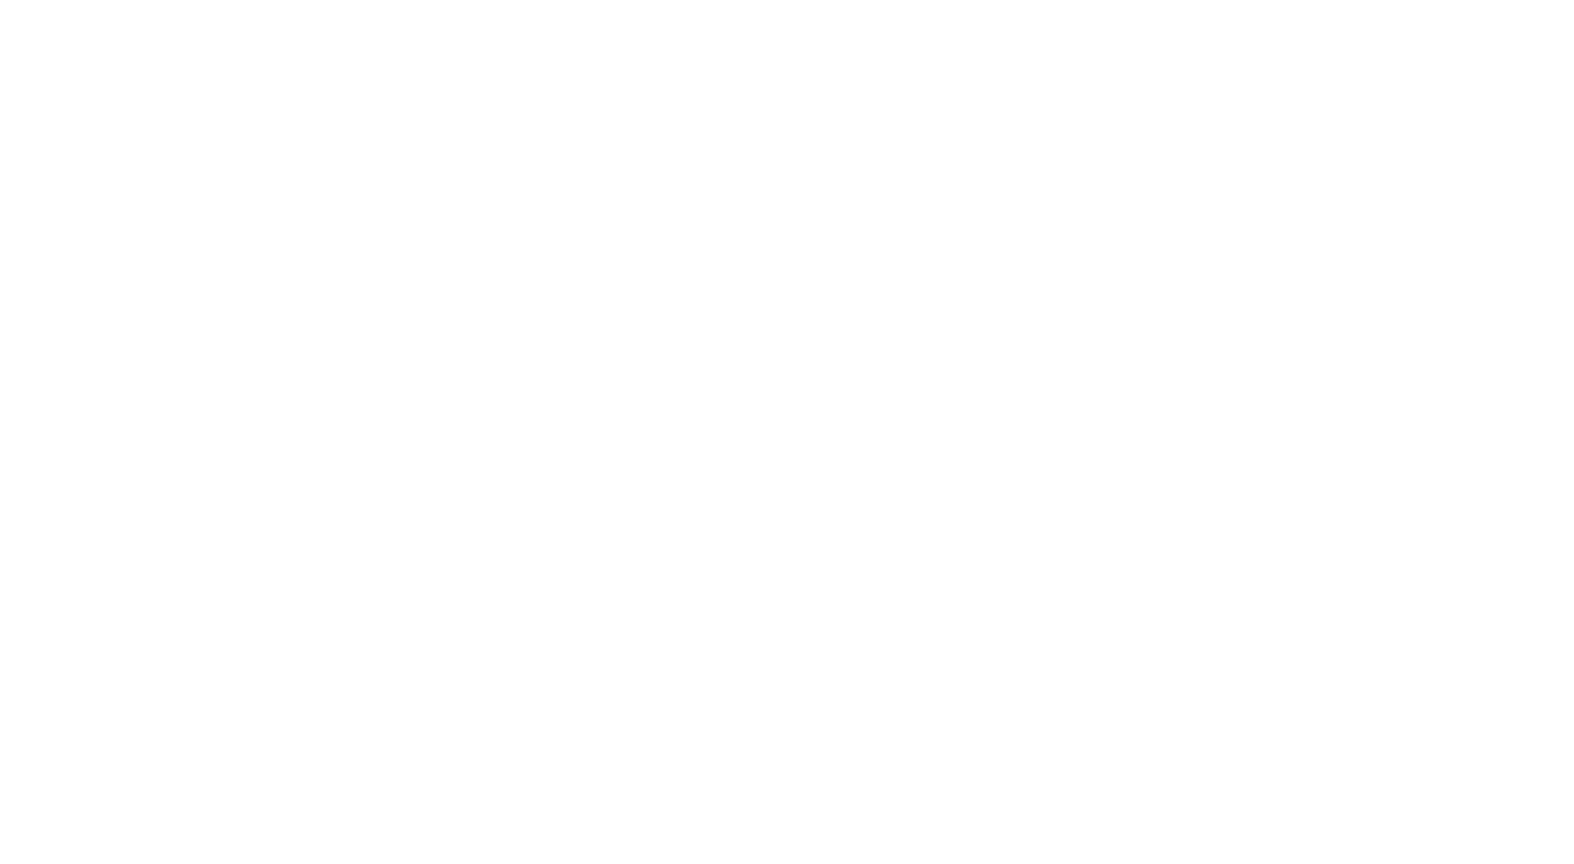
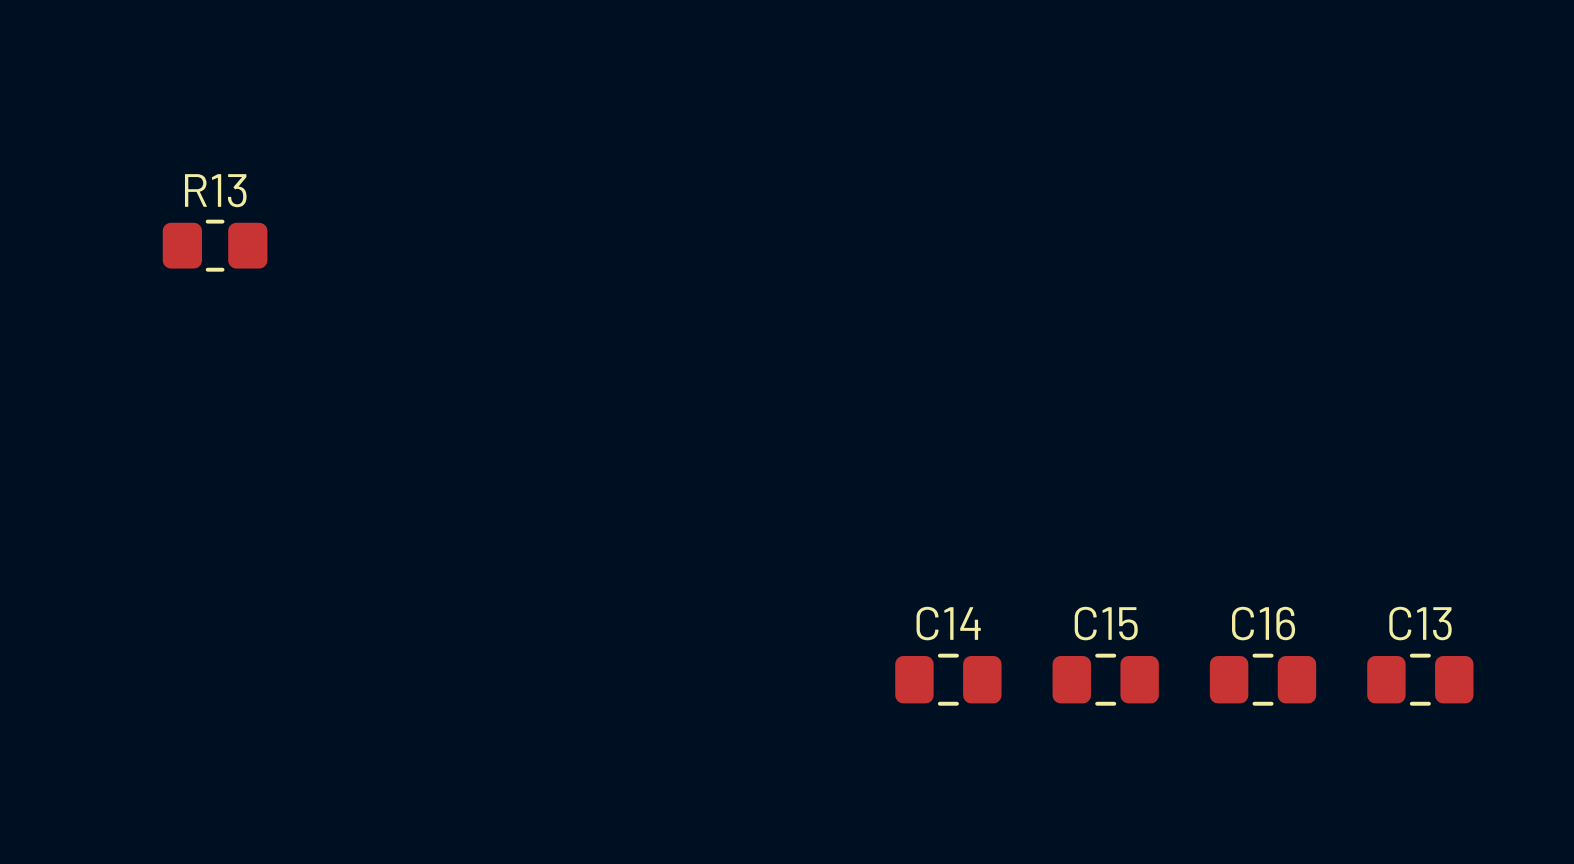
R13: none -> (215, 245)
C14: none -> (948, 679)
C15: none -> (1105, 679)
C16: none -> (1263, 679)
C13: none -> (1420, 679)

